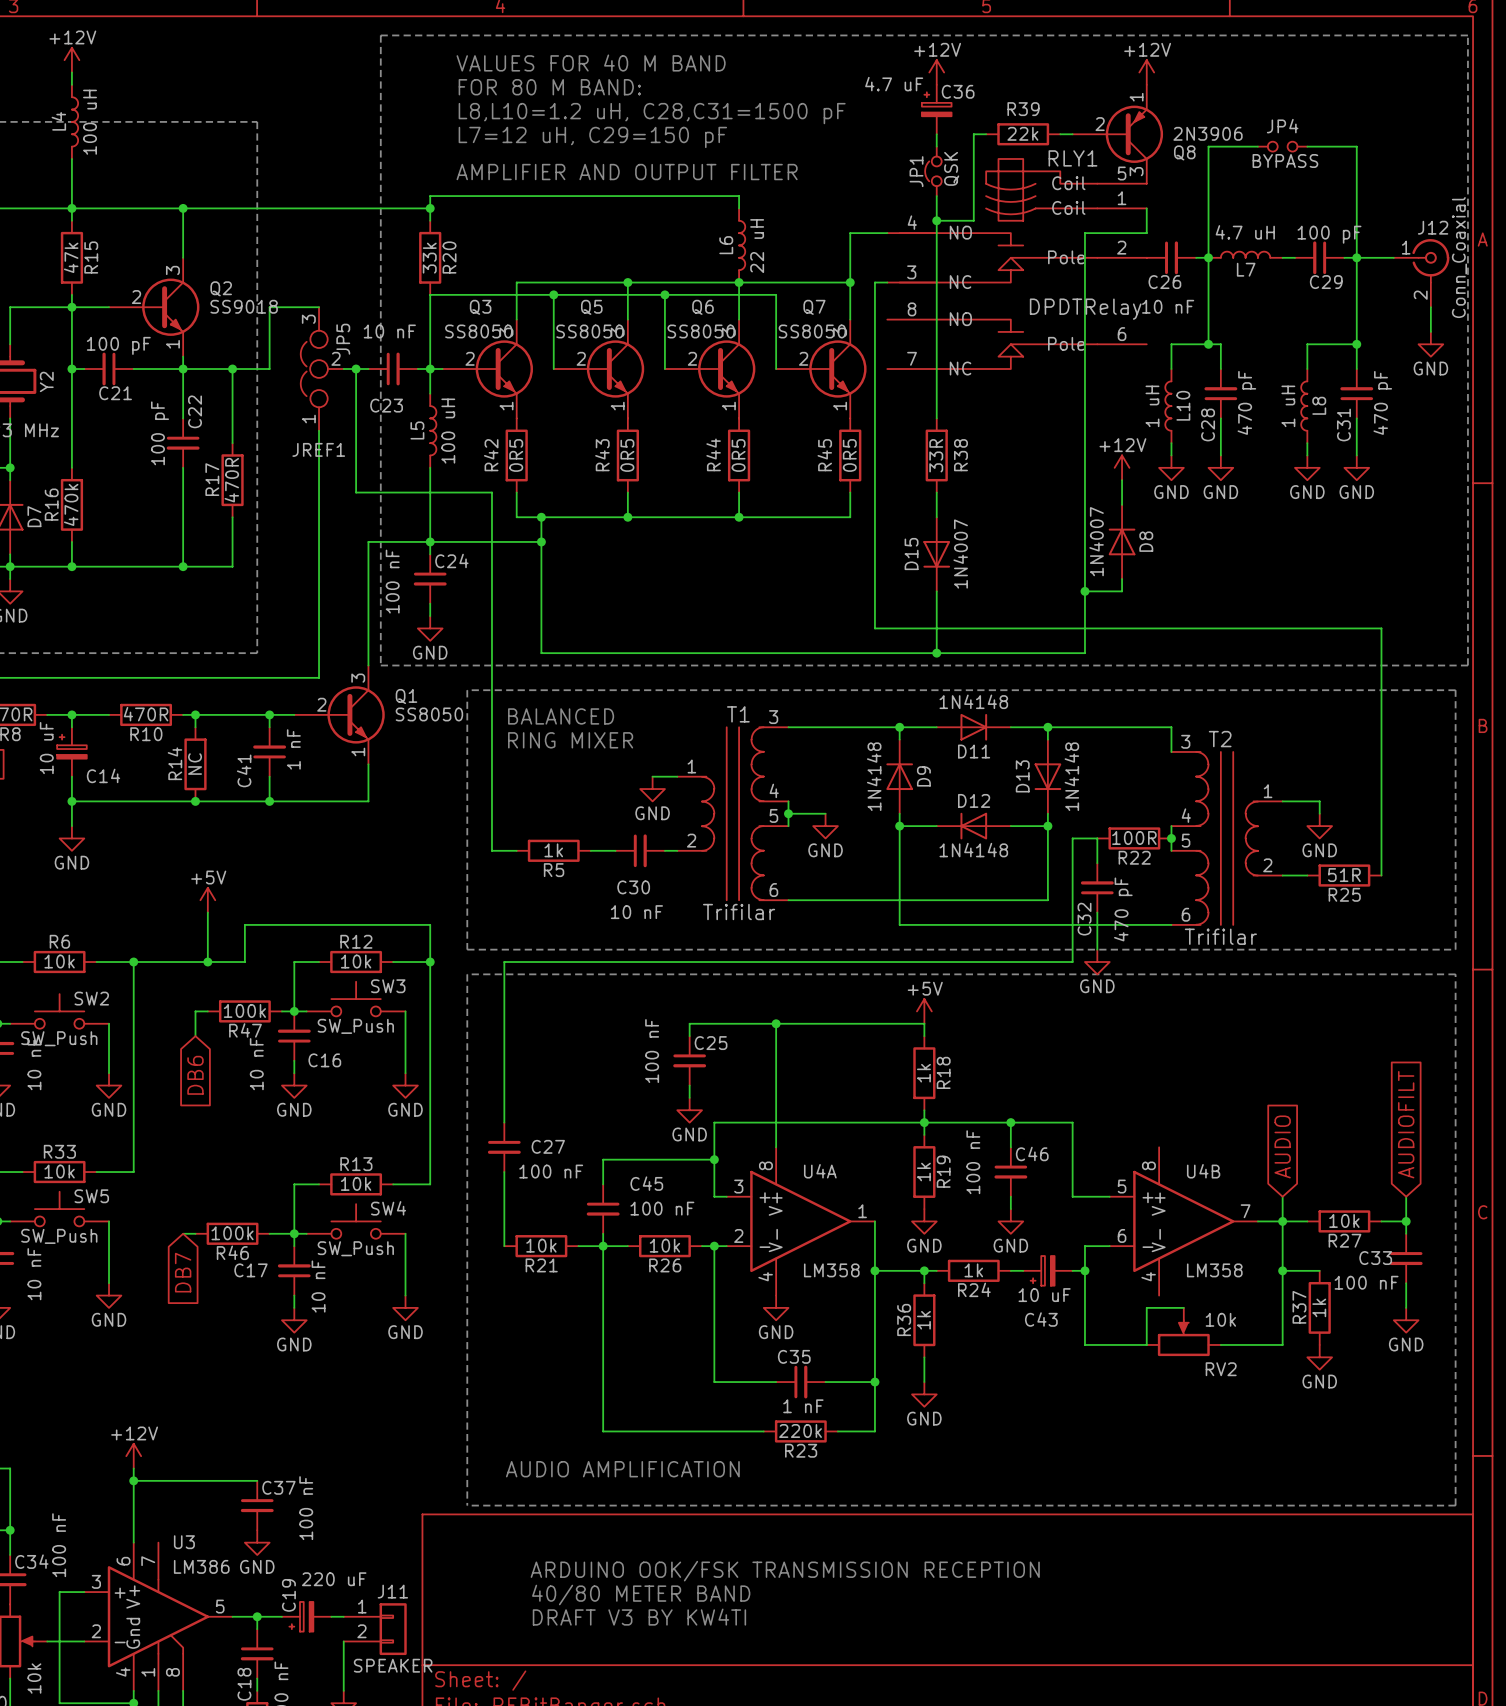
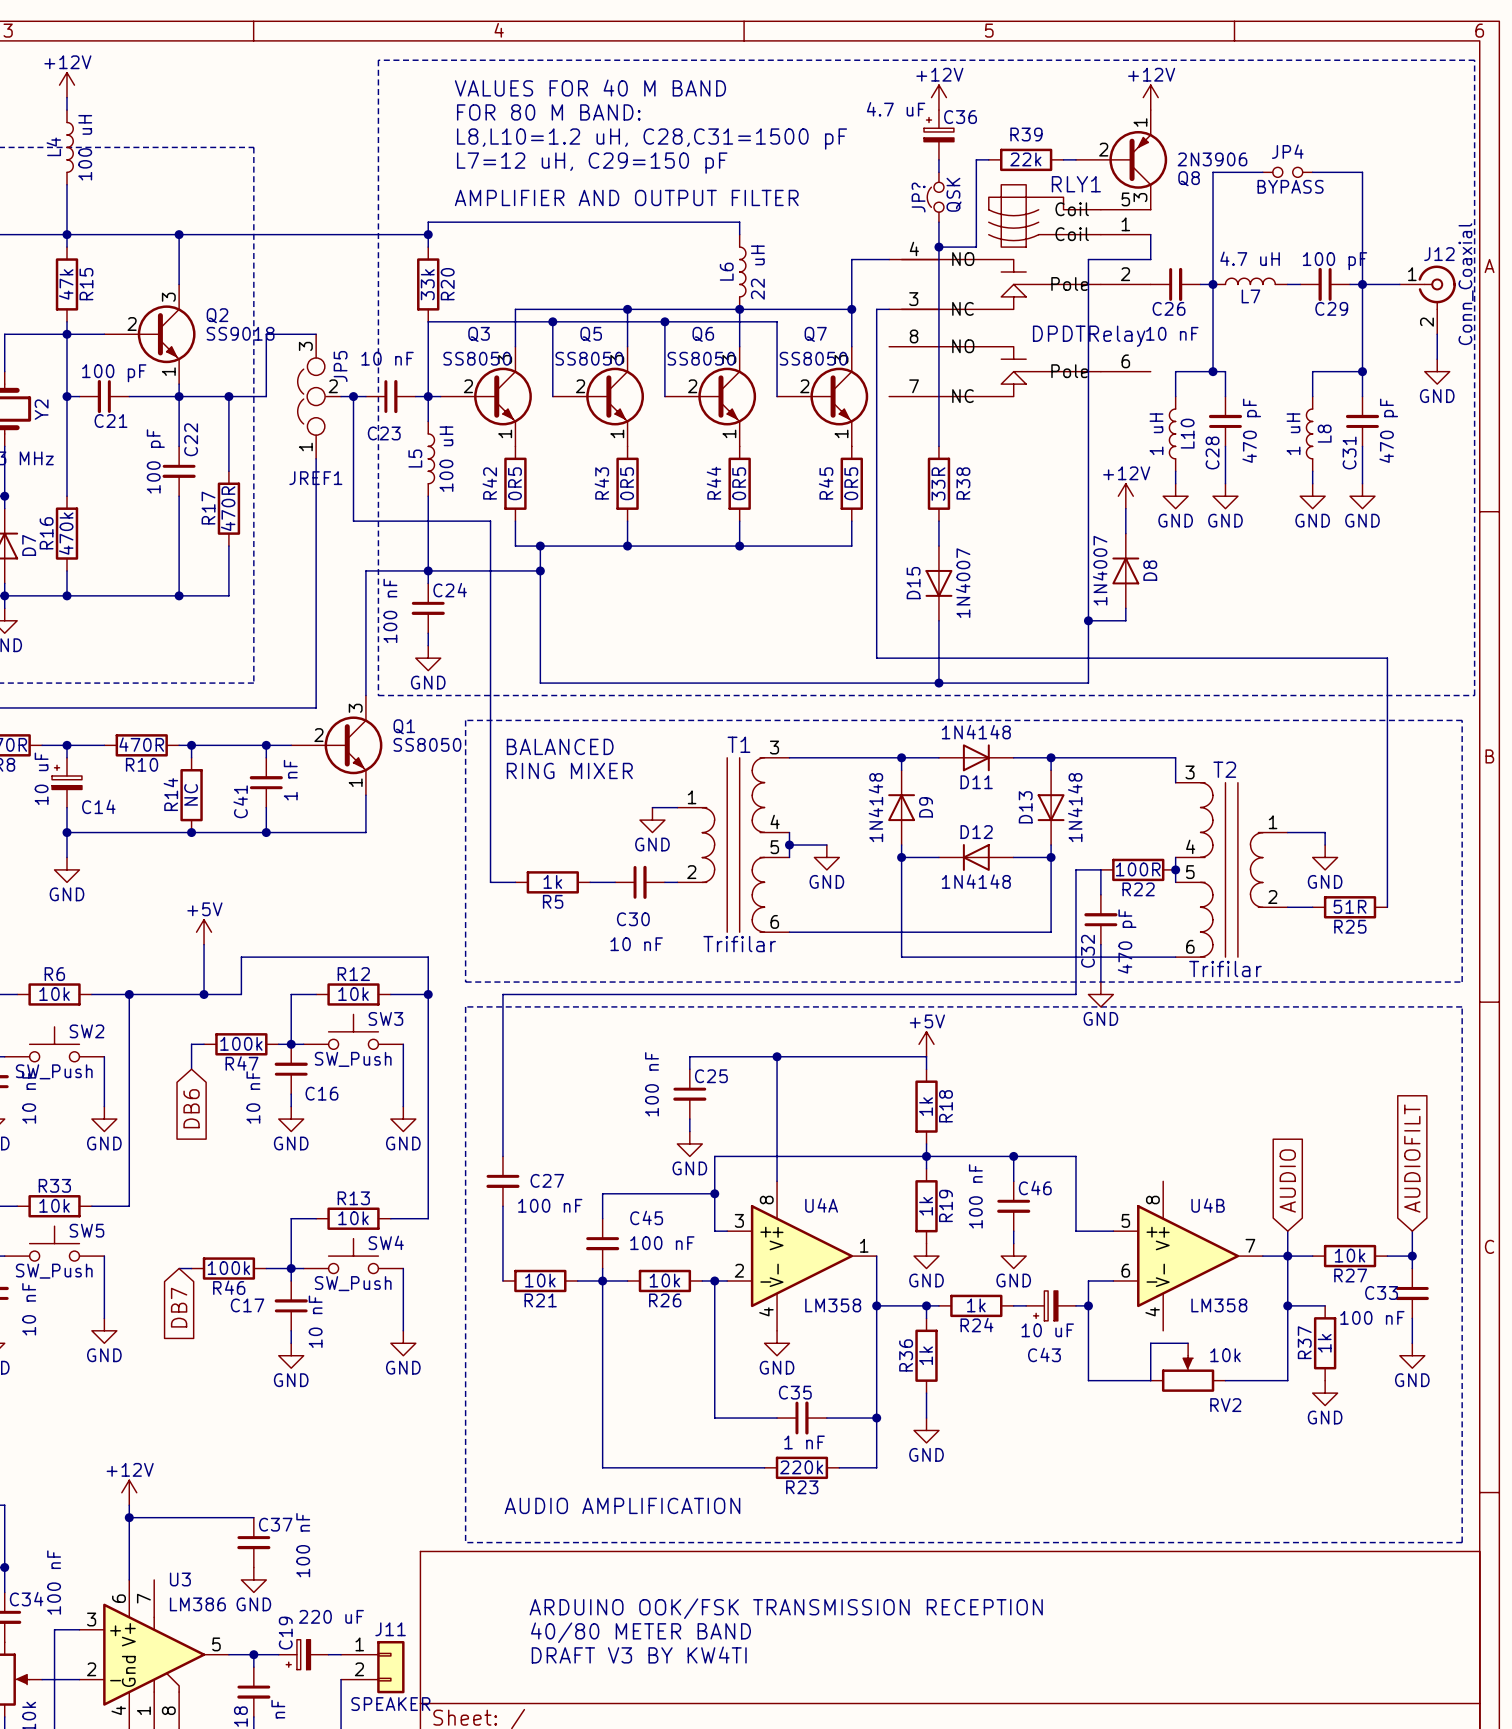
JP1 name: JP1 (916, 171) -> JP? (918, 197)

